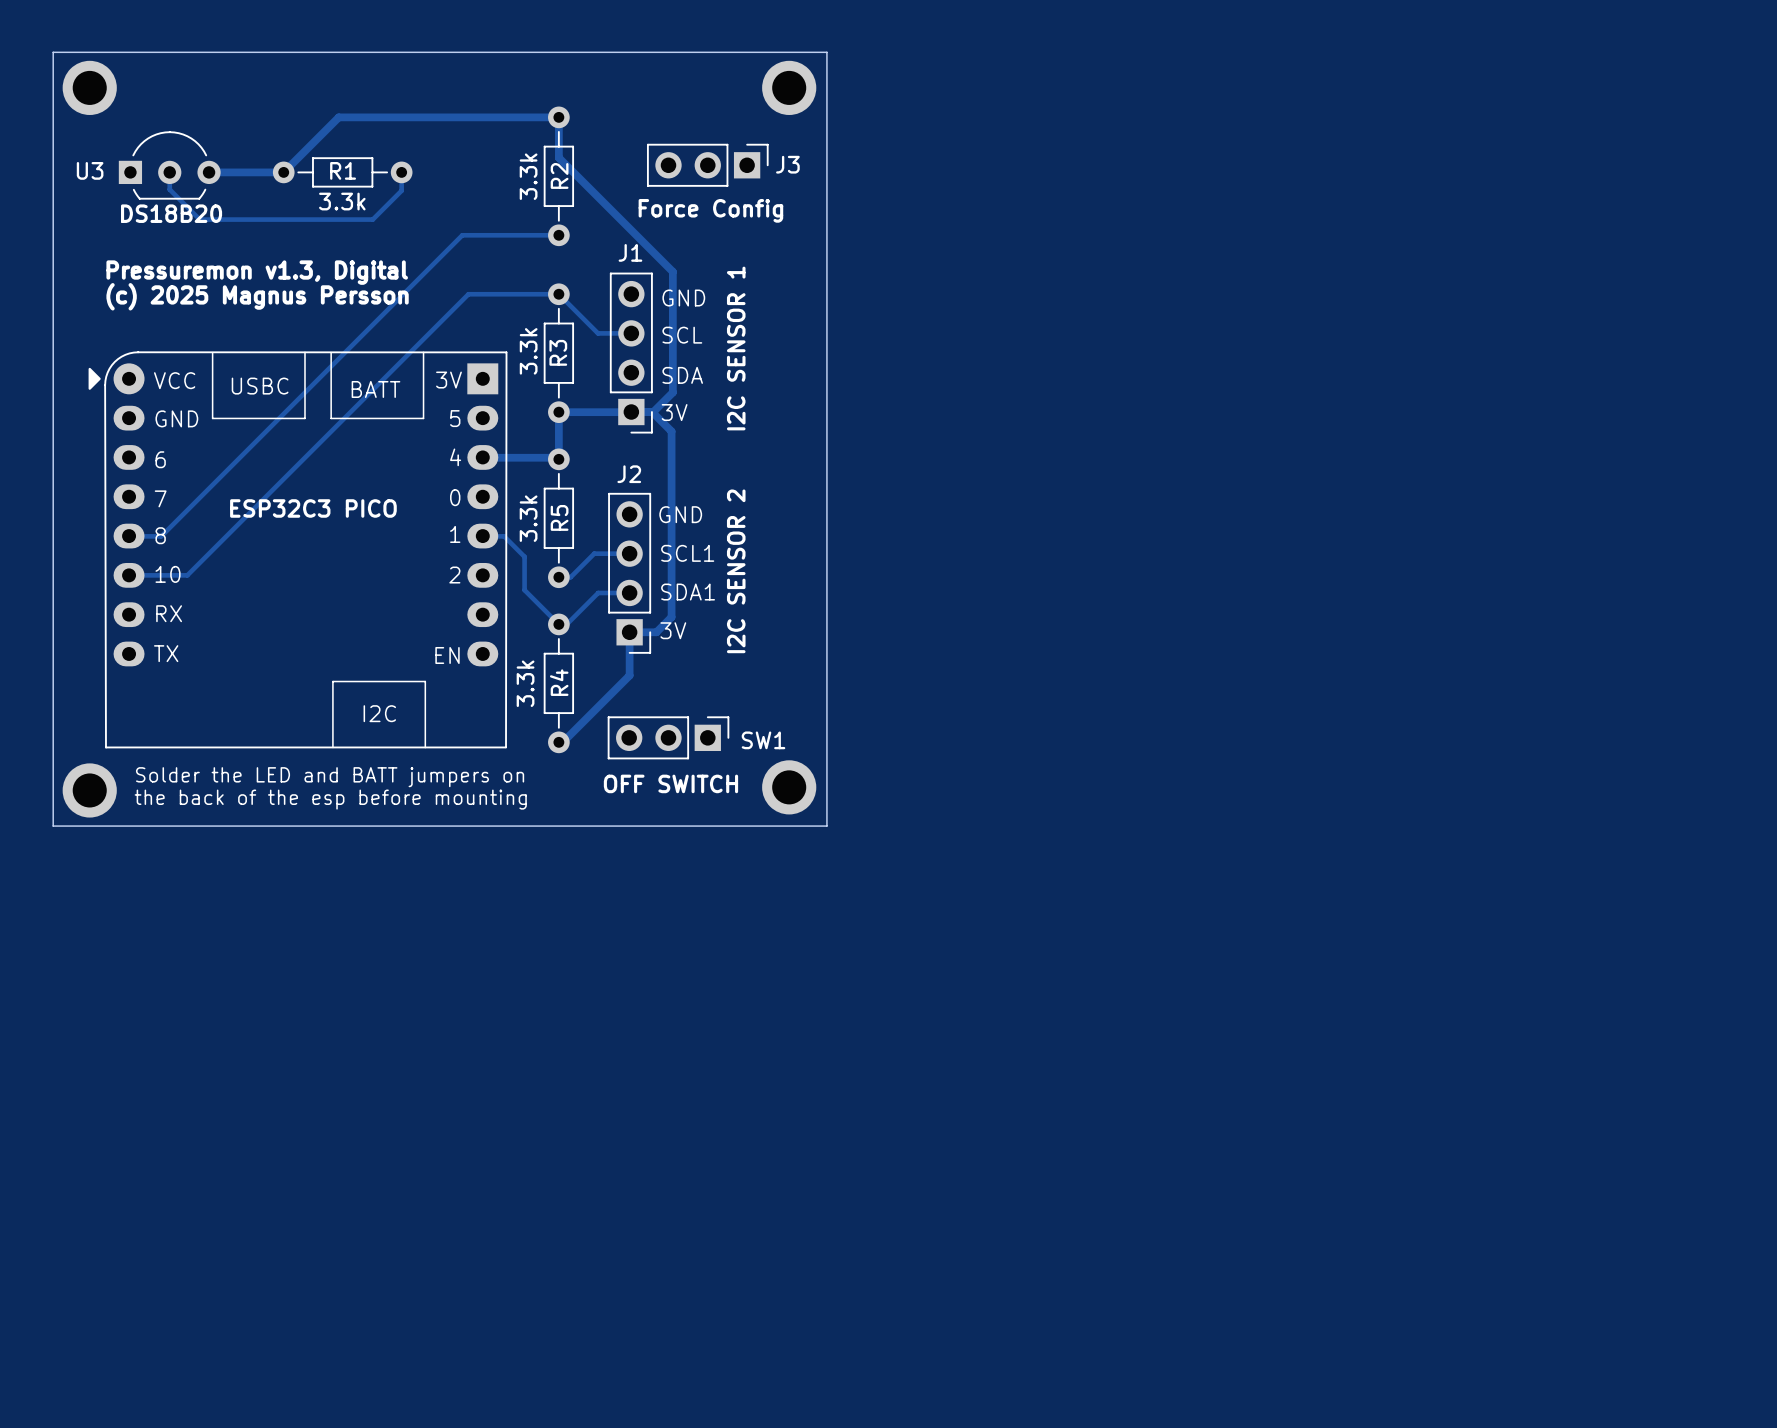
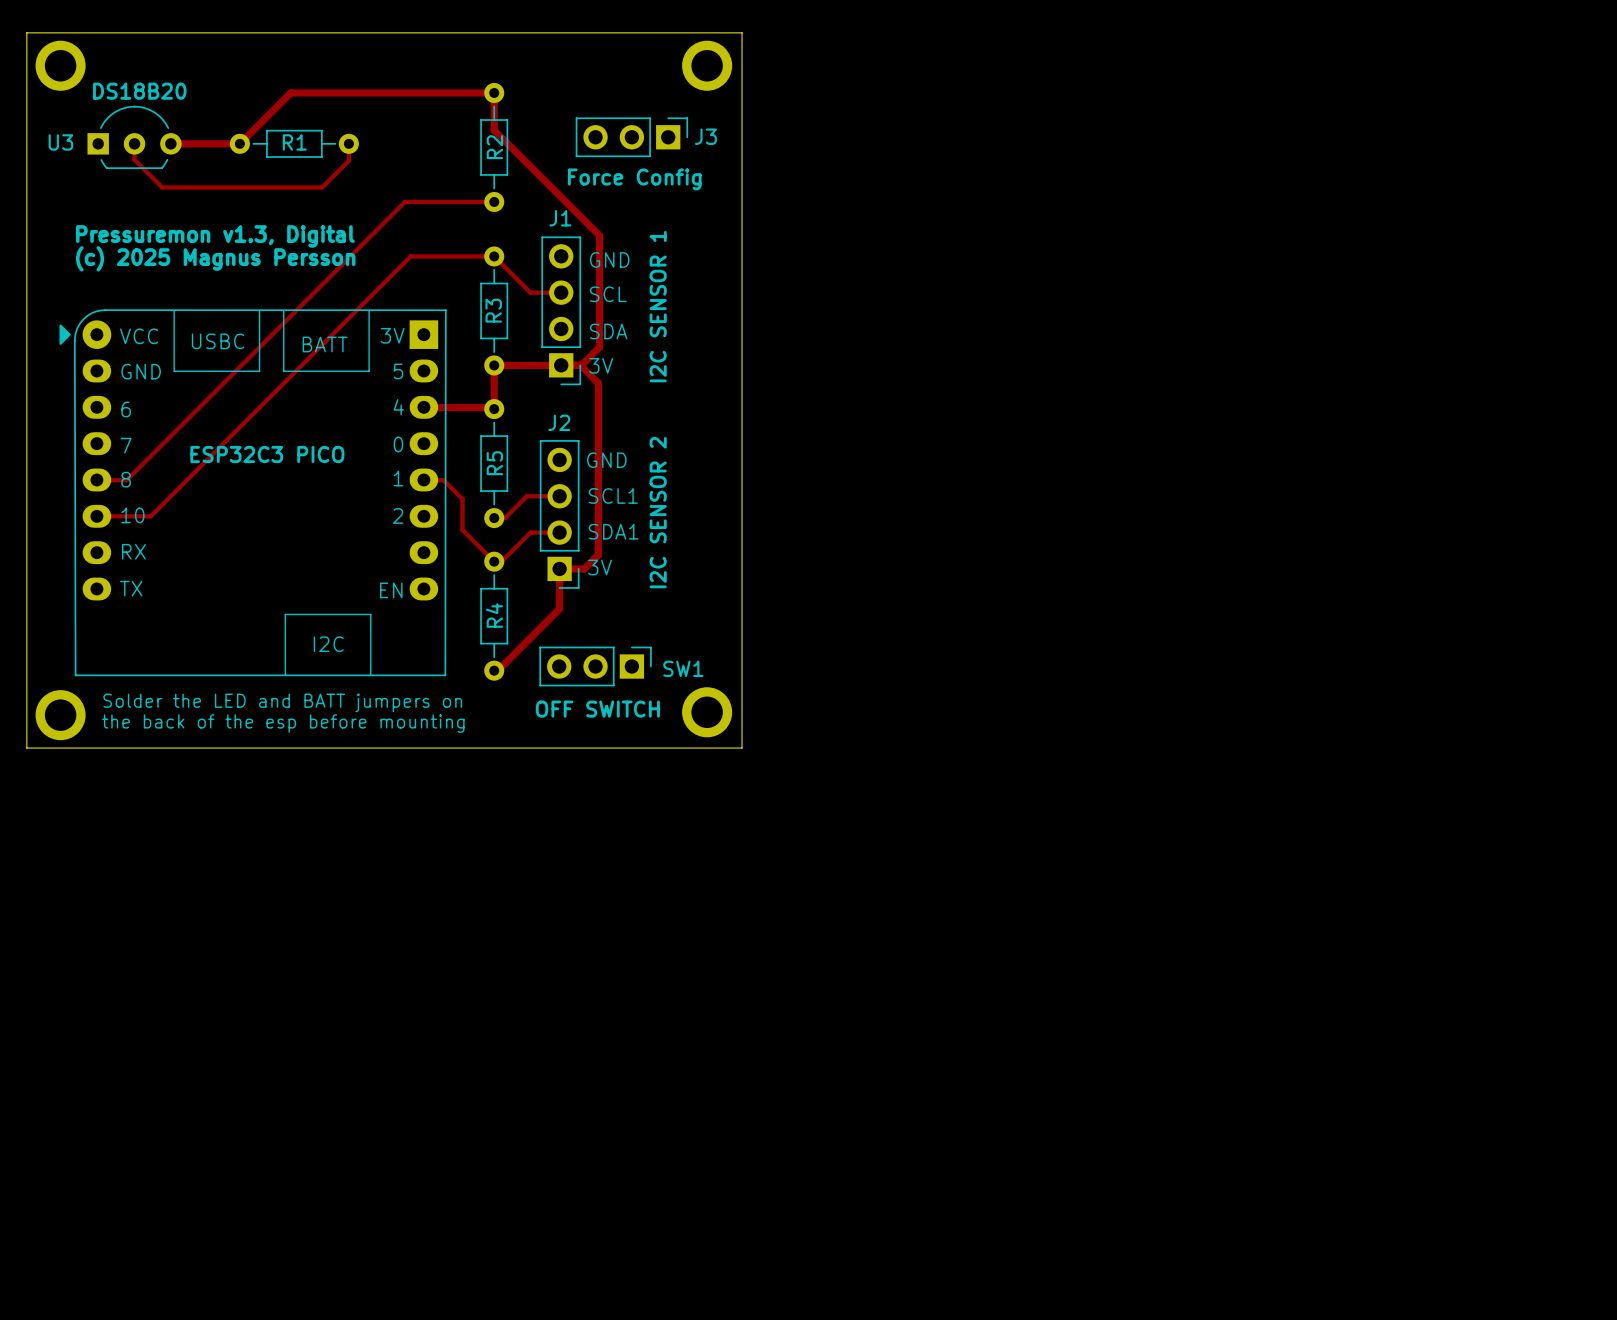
R2 value: 3.3k (528, 176) -> none
R1 value: 3.3k (342, 201) -> none
text position: DS18B20 (171, 213) -> DS18B20 (139, 91)
R3 value: 3.3k (528, 351) -> none
R5 value: 3.3k (528, 518) -> none
R4 value: 3.3k (525, 683) -> none

